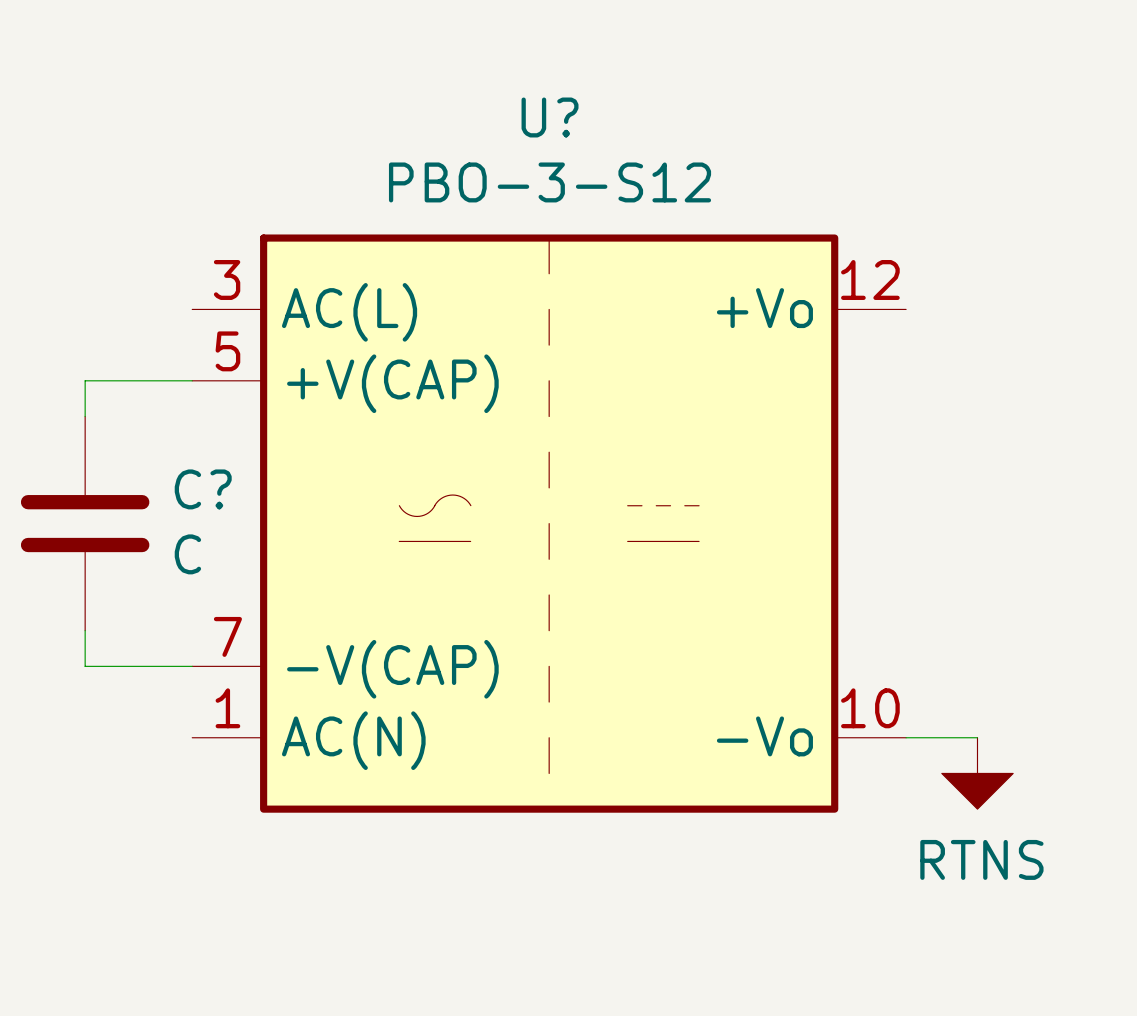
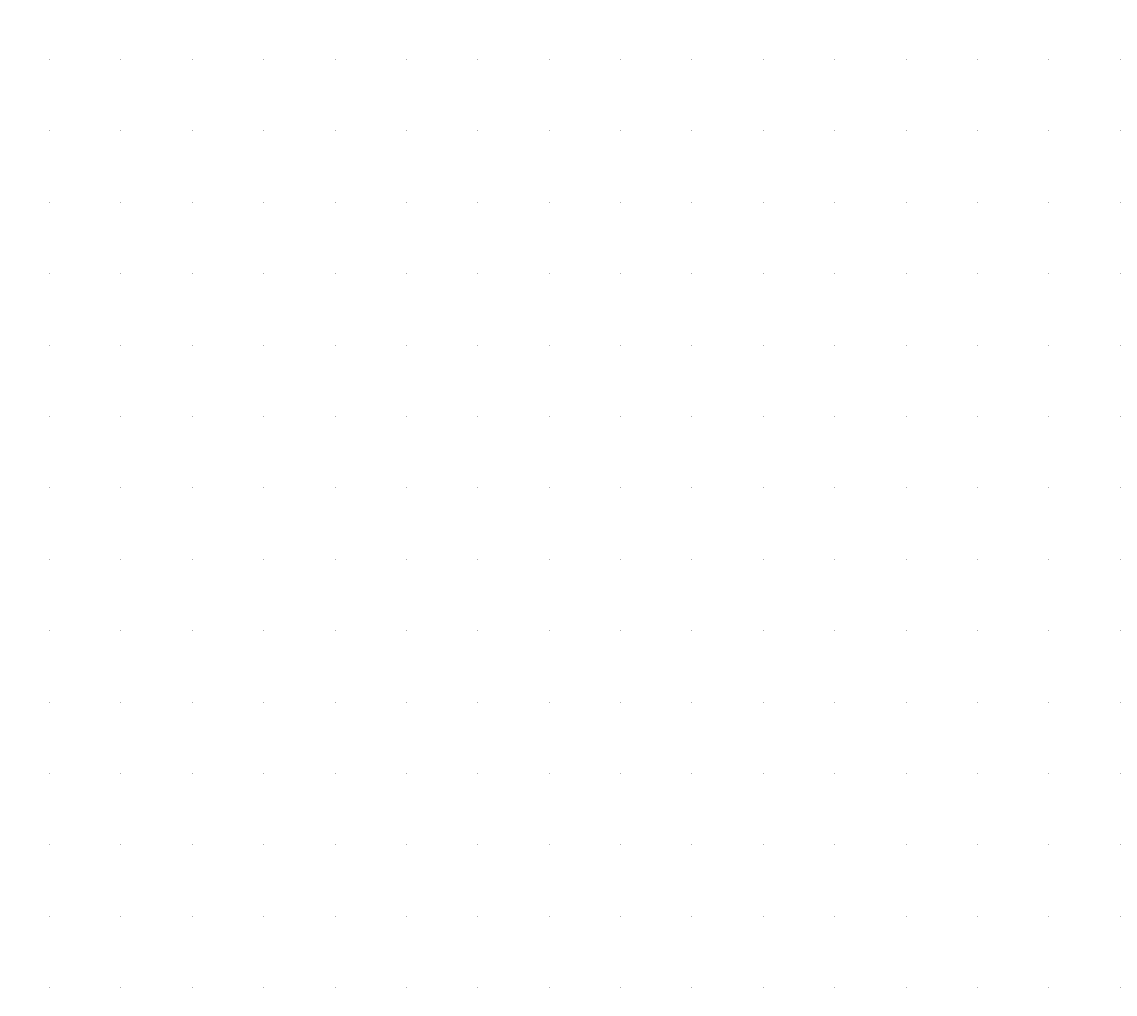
wire: (192, 380) (85, 380) (85, 416) -> none
C?: C (85, 523) -> none
U?: PBO-3-S12 (549, 523) -> none
wire: (85, 630) (85, 666) (192, 666) -> none
wire: (906, 737) (977, 737) -> none
power symbol: RTNS (977, 773) -> none

